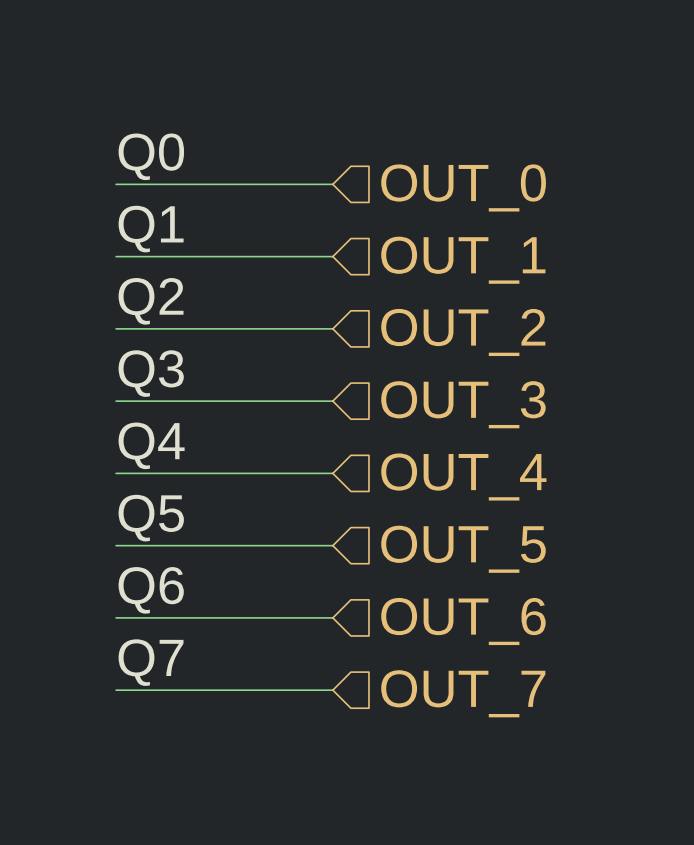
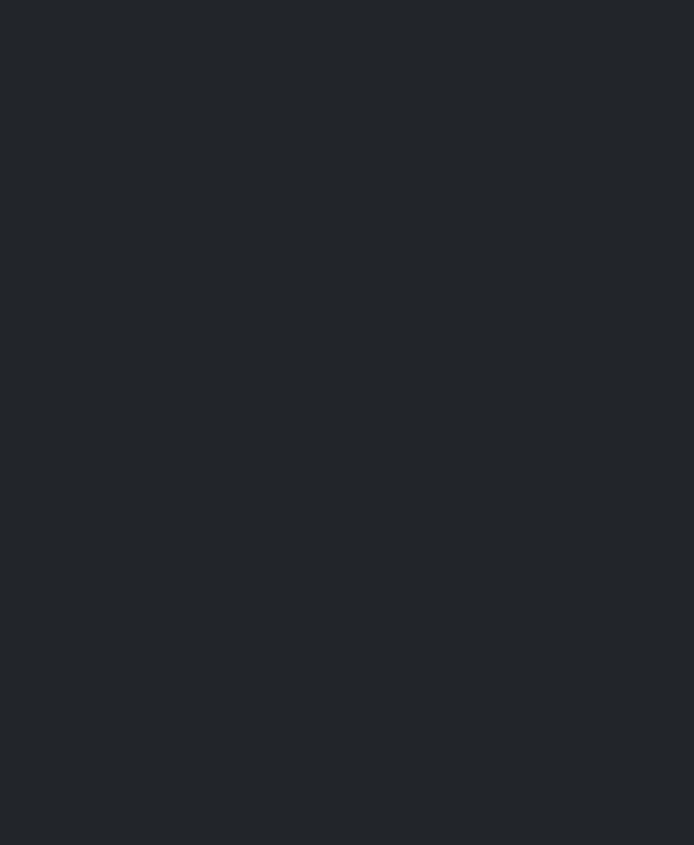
label: Q0 (151, 156) -> none
wire: (116, 184) (332, 184) -> none
hierarchical label: OUT_0 (463, 187) -> none
label: Q1 (151, 229) -> none
wire: (116, 256) (332, 256) -> none
hierarchical label: OUT_1 (463, 260) -> none
label: Q2 (151, 301) -> none
wire: (116, 328) (332, 328) -> none
hierarchical label: OUT_2 (463, 332) -> none
label: Q3 (151, 373) -> none
wire: (116, 401) (332, 401) -> none
hierarchical label: OUT_3 (463, 404) -> none
label: Q4 (151, 445) -> none
wire: (116, 473) (332, 473) -> none
hierarchical label: OUT_4 (463, 476) -> none
label: Q5 (151, 518) -> none
wire: (116, 545) (332, 545) -> none
hierarchical label: OUT_5 (463, 549) -> none
label: Q6 (151, 590) -> none
wire: (116, 617) (332, 617) -> none
hierarchical label: OUT_6 (463, 621) -> none
label: Q7 (151, 662) -> none
wire: (116, 690) (332, 690) -> none
hierarchical label: OUT_7 (463, 693) -> none

